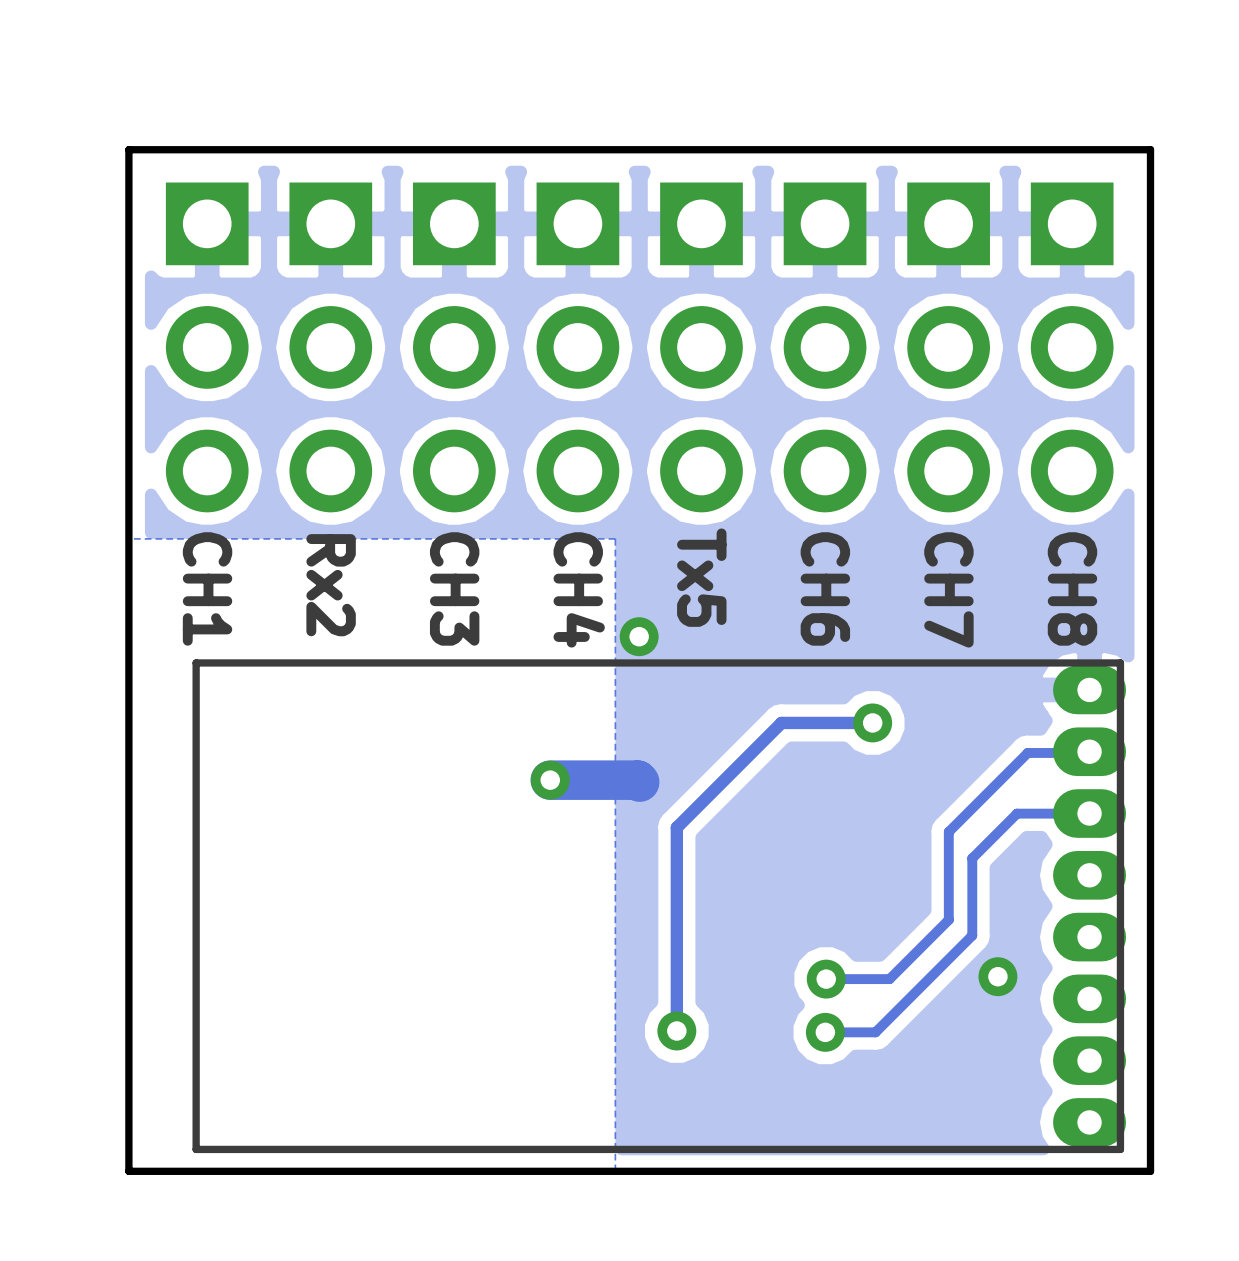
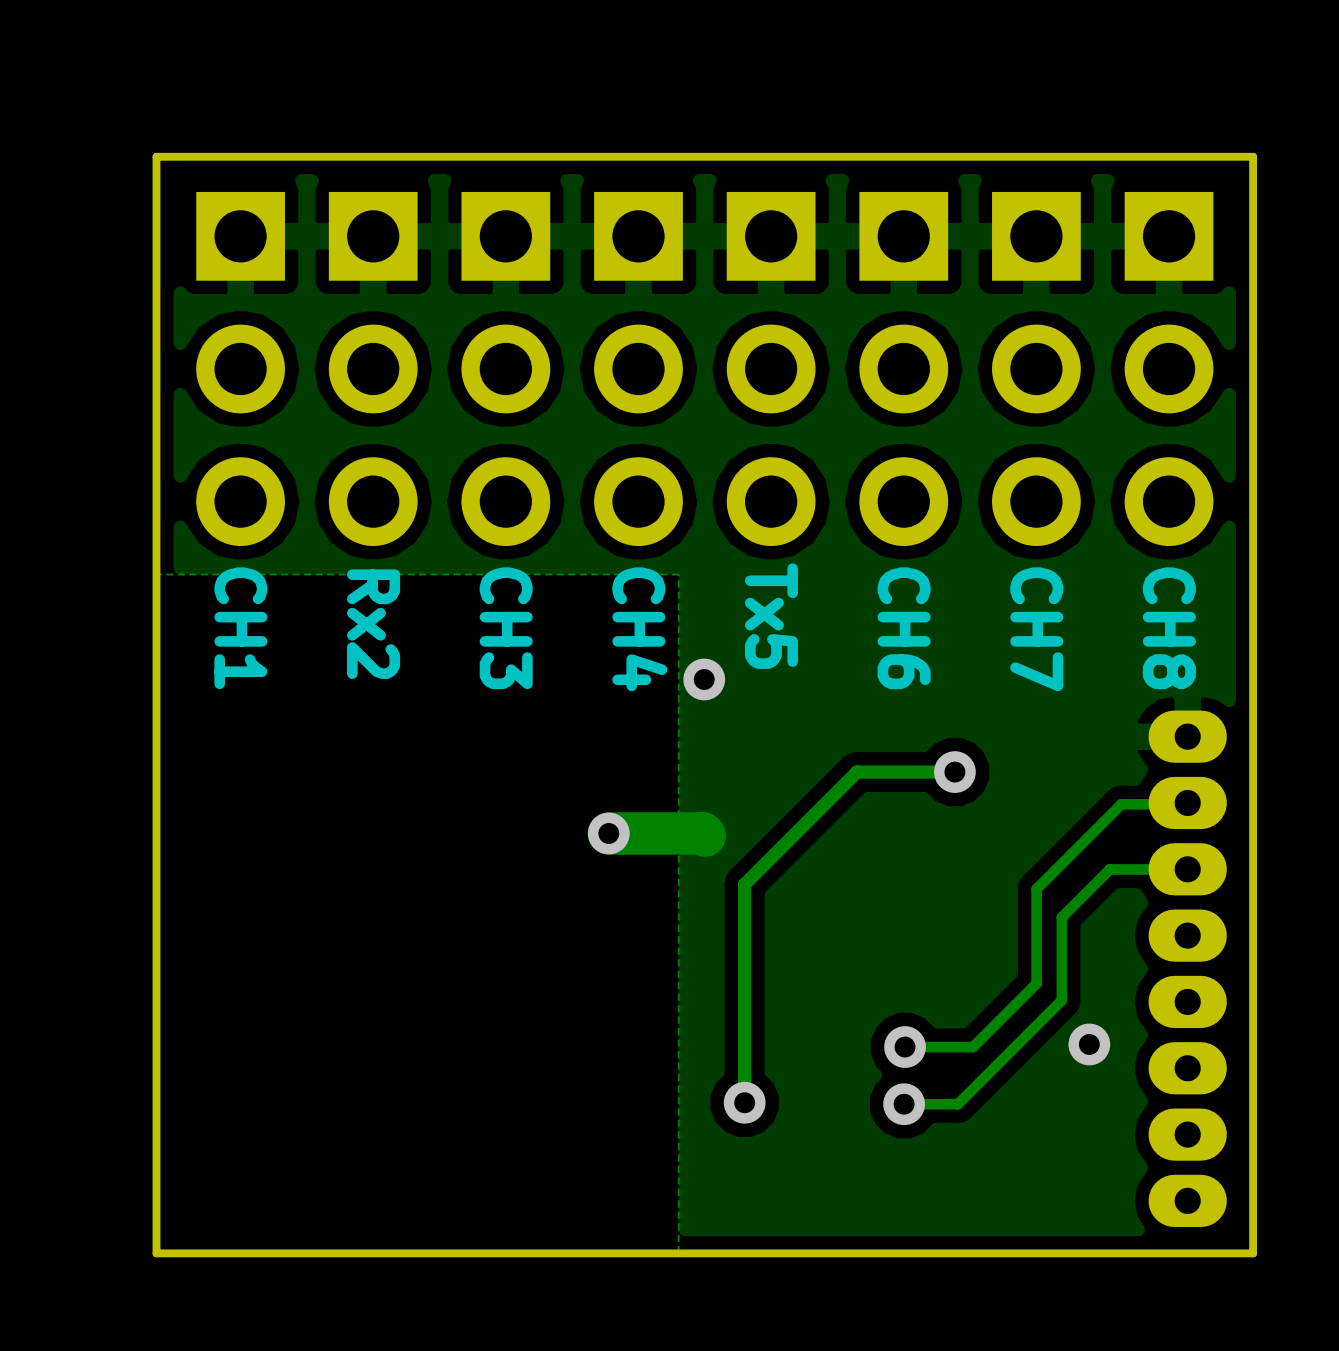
part: (659, 906) -> none
part: none -> (1187, 968)

